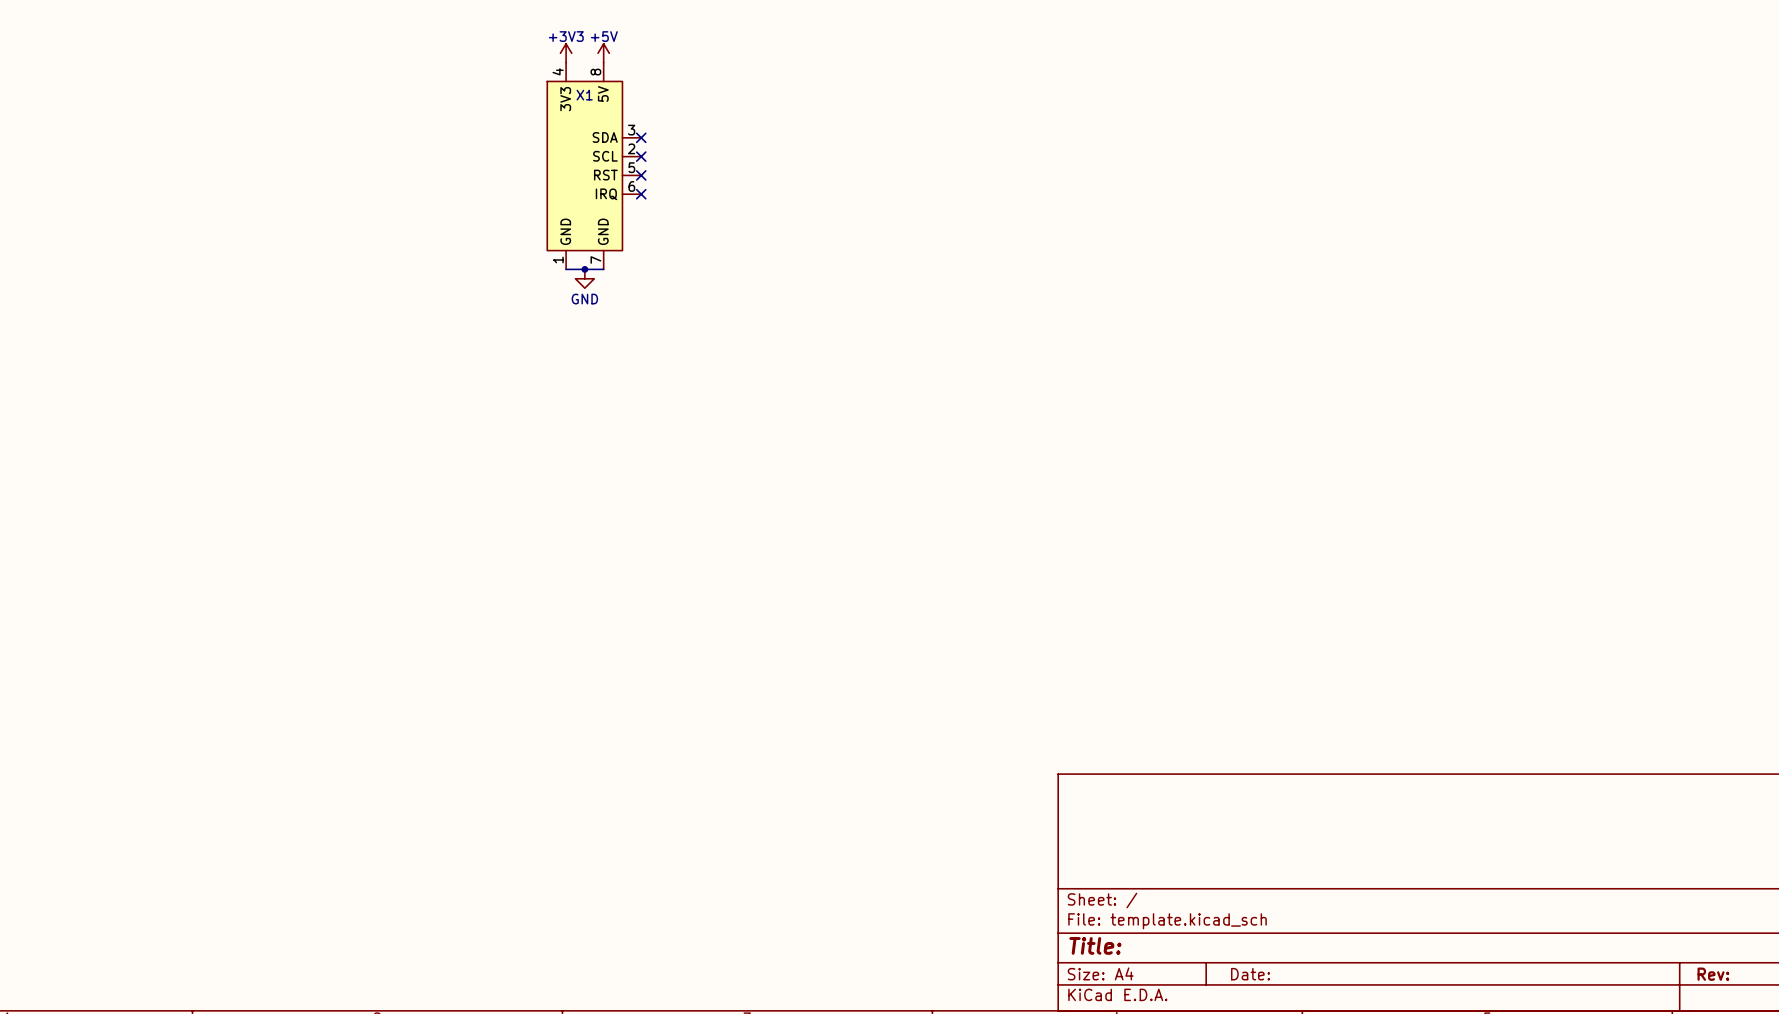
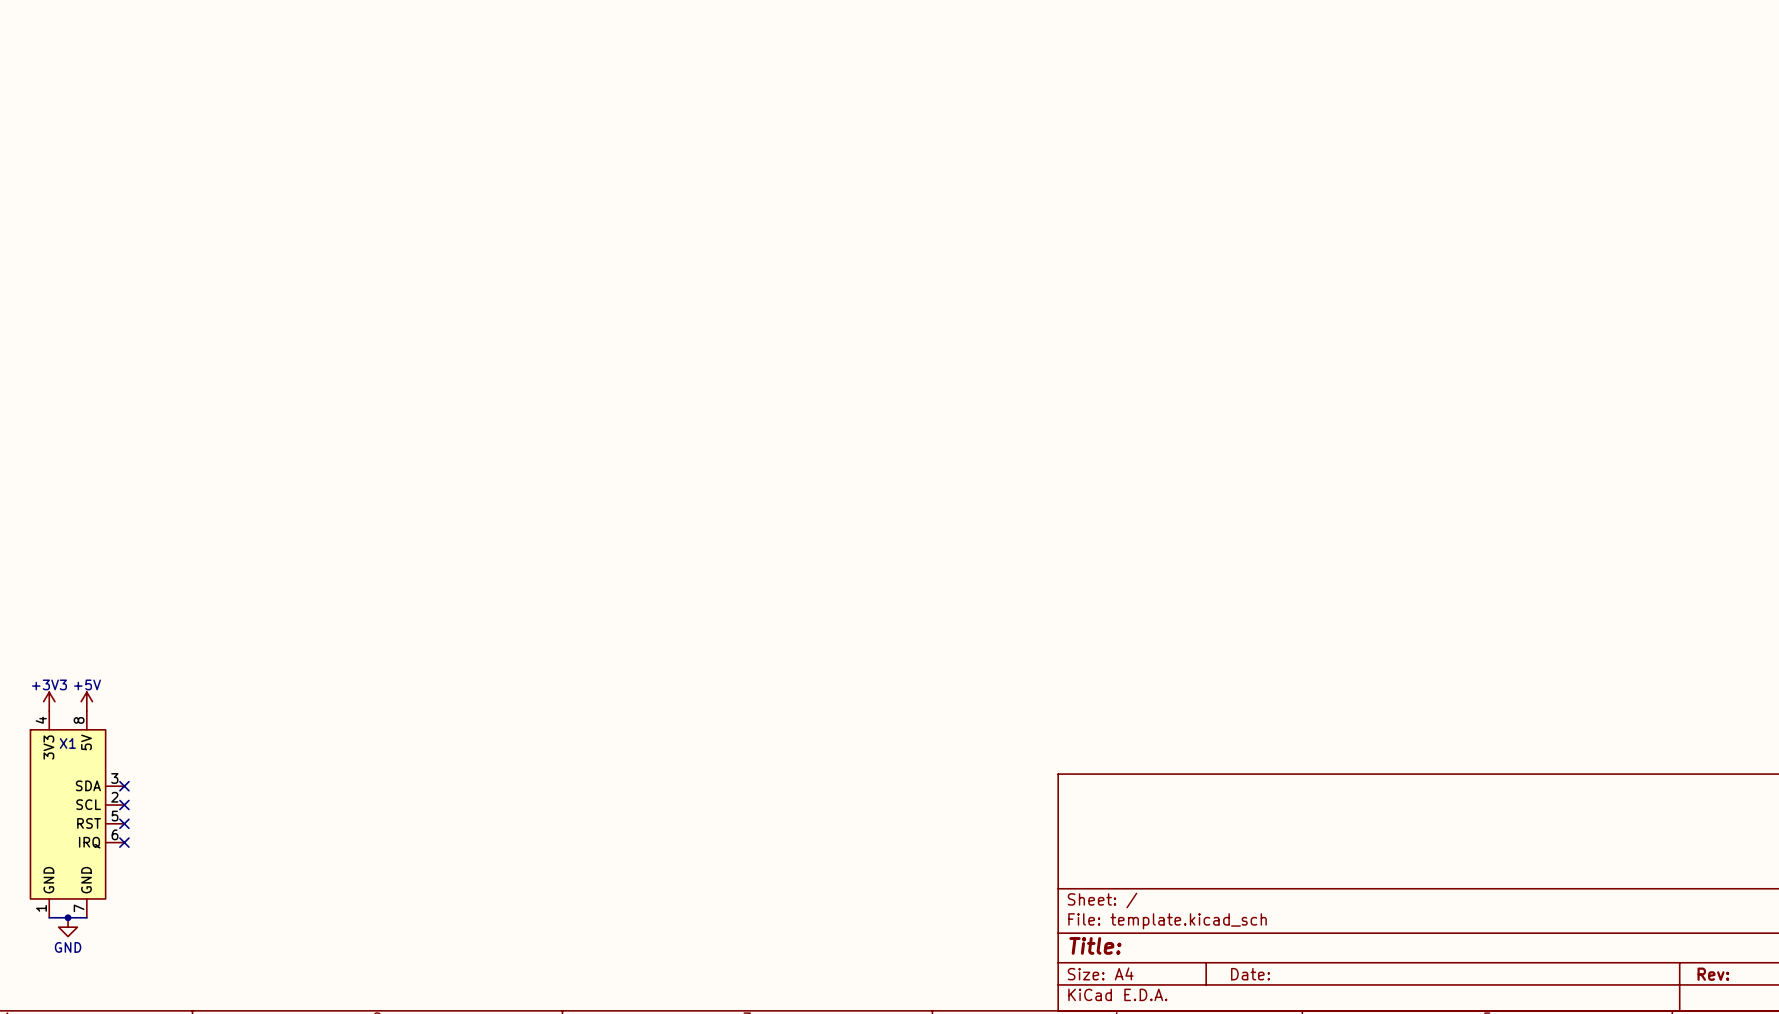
power symbol: +3V3 (566, 53) -> none
power symbol: +5V (603, 53) -> none
no-connect mark: (641, 137) -> none
no-connect mark: (641, 156) -> none
X1 position: (594, 166) -> (77, 814)
no-connect mark: (641, 175) -> none
no-connect mark: (641, 194) -> none
wire: (566, 269) (603, 269) -> none
junction: (584, 269) -> none
power symbol: GND (584, 278) -> none
power symbol: none -> +3V3 (49, 701)
power symbol: none -> +5V (86, 701)
no-connect mark: none -> (124, 786)
no-connect mark: none -> (124, 805)
no-connect mark: none -> (124, 823)
no-connect mark: none -> (124, 842)
wire: none -> (49, 917) (86, 917)
junction: none -> (68, 917)
power symbol: none -> GND (68, 927)

